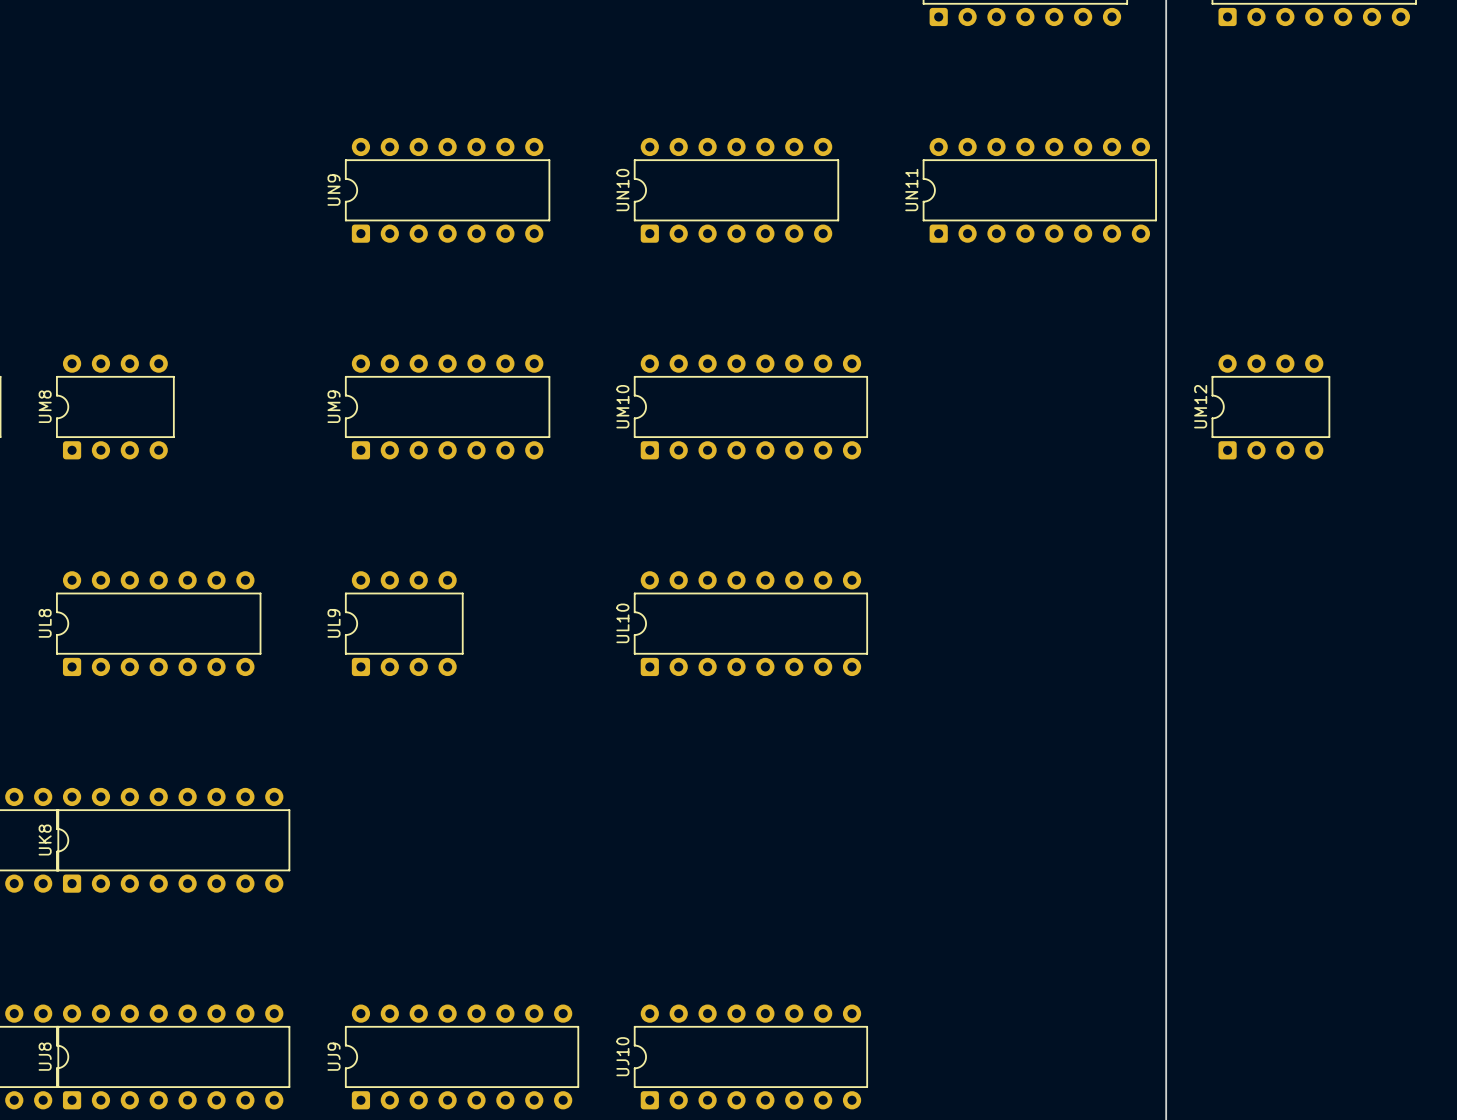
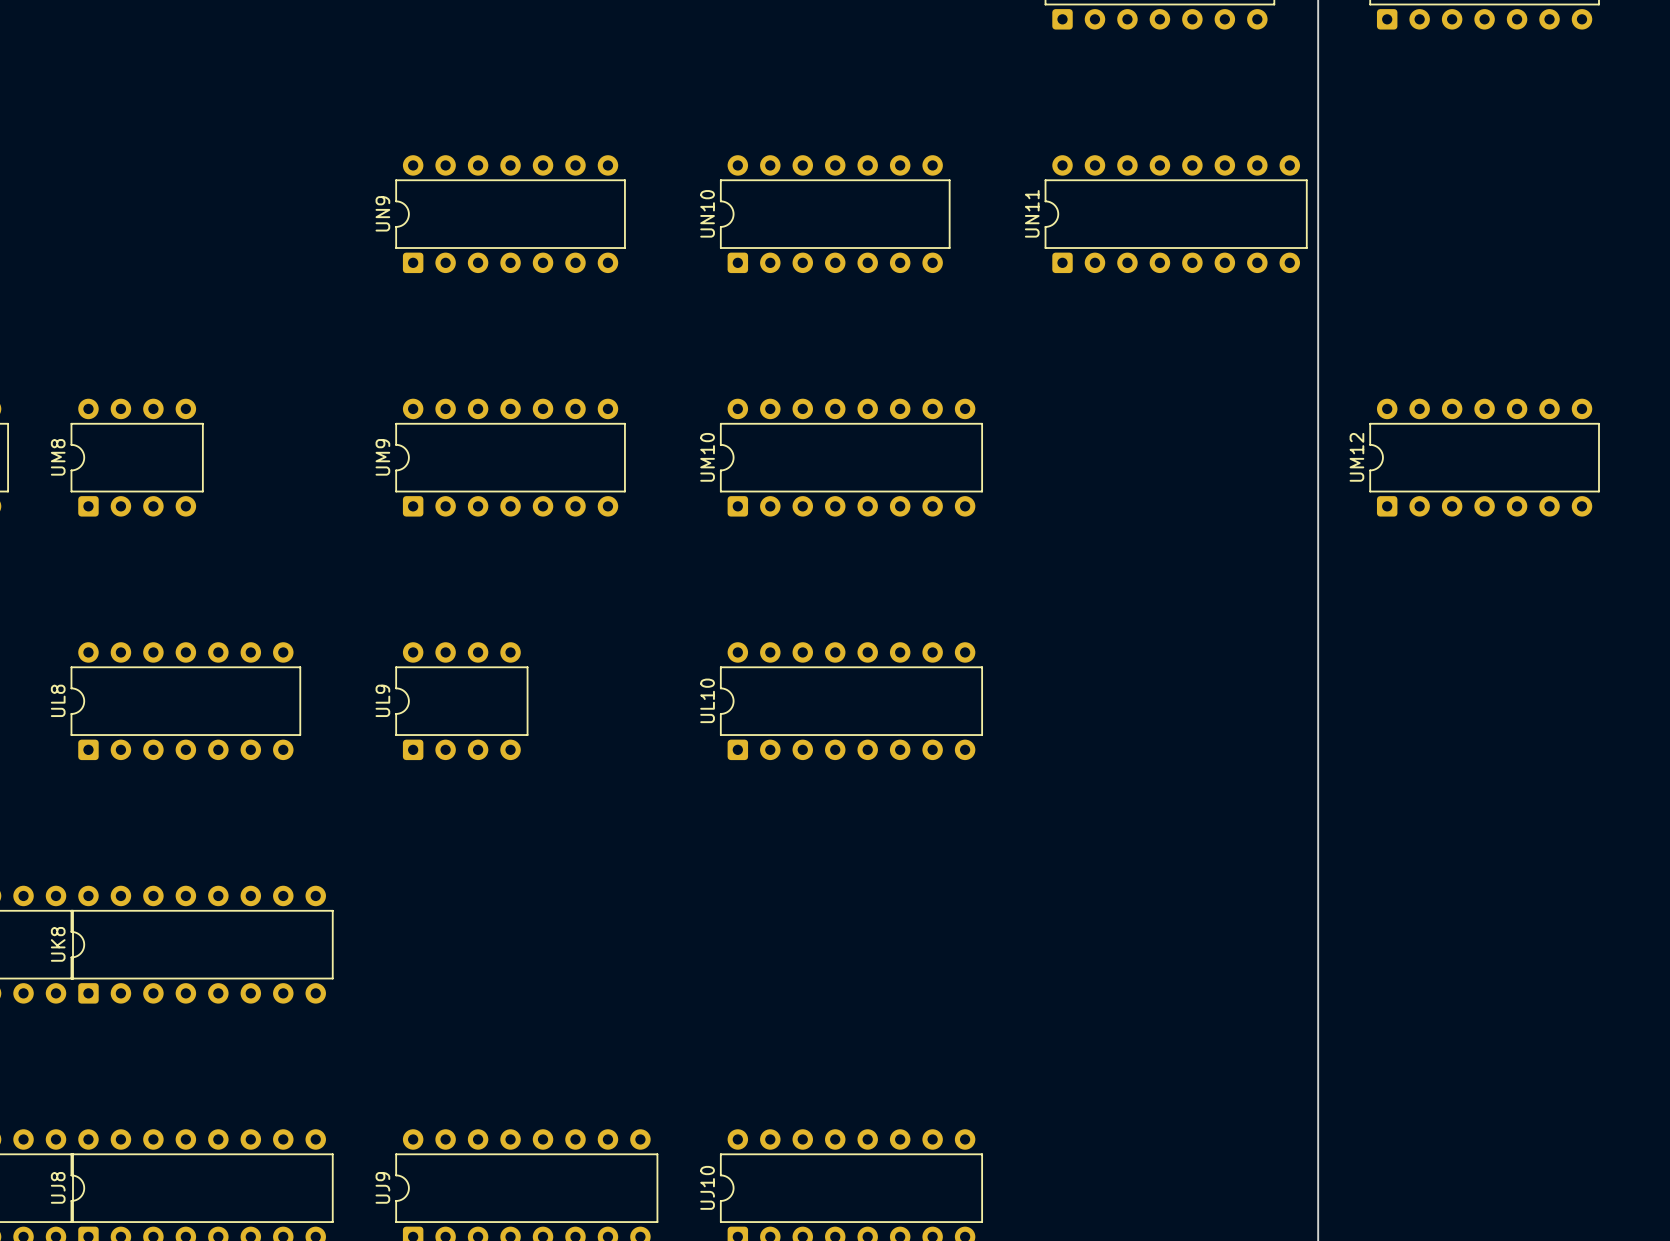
UM12 footprint: [1211, 354, 1331, 460] -> [1369, 398, 1600, 517]

